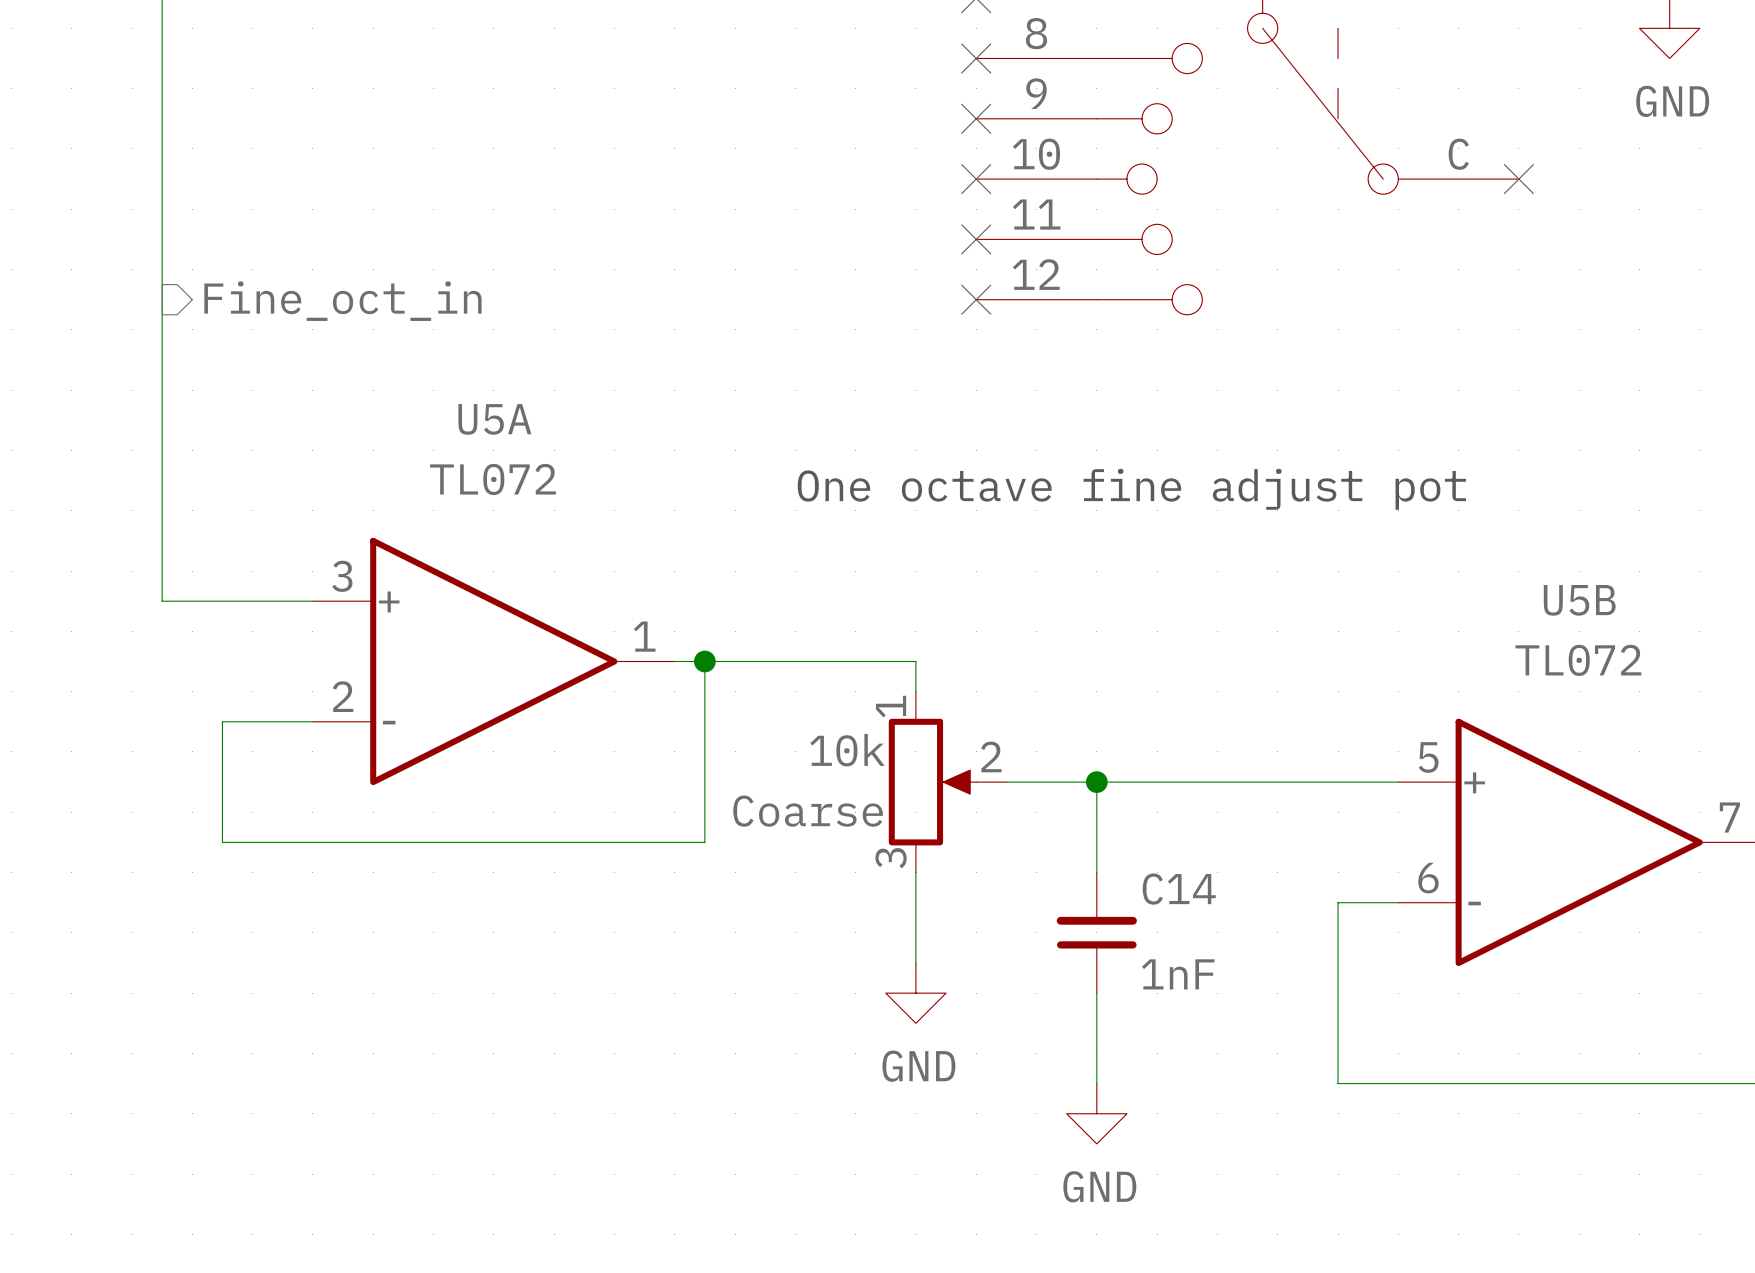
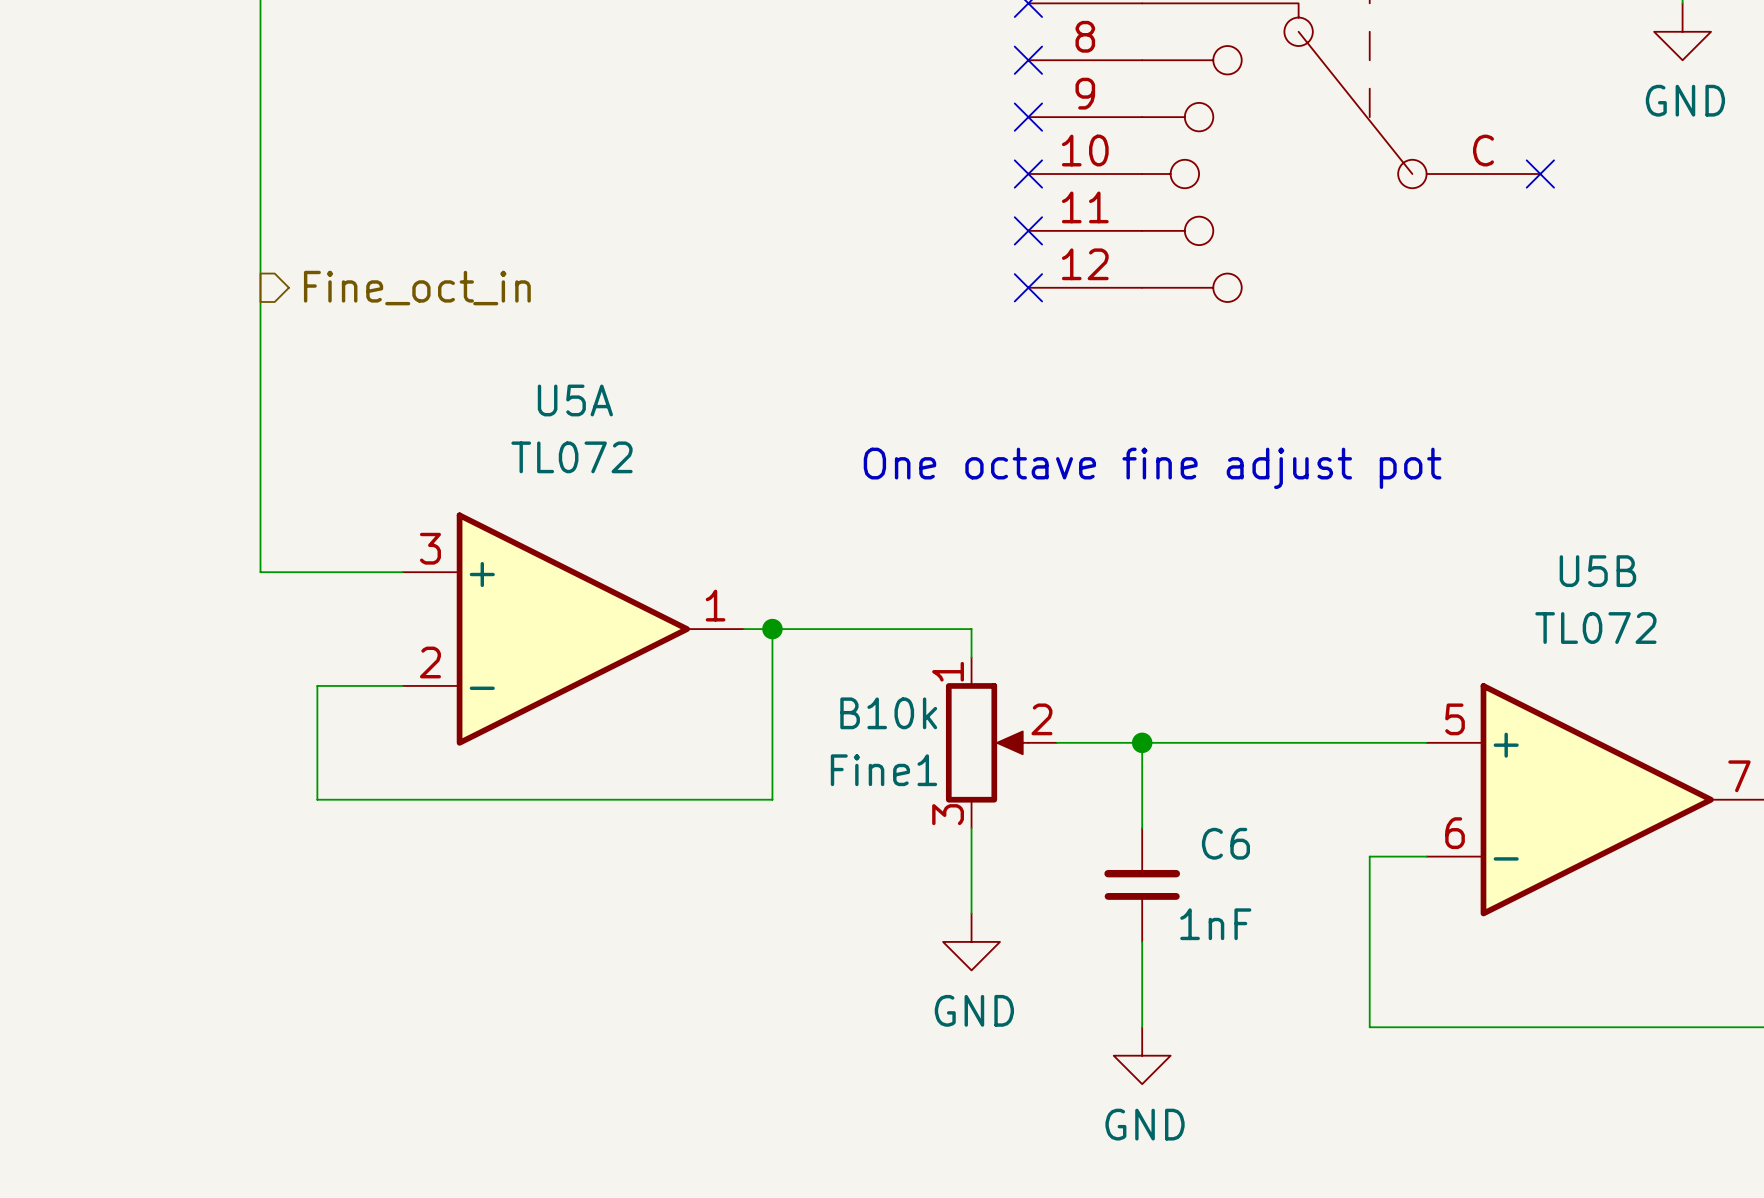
Coarse value: 10k (847, 750) -> B10k (888, 713)
Coarse name: Coarse (808, 811) -> Fine1 (883, 770)
C14 name: C14 (1179, 889) -> C6 (1225, 843)

